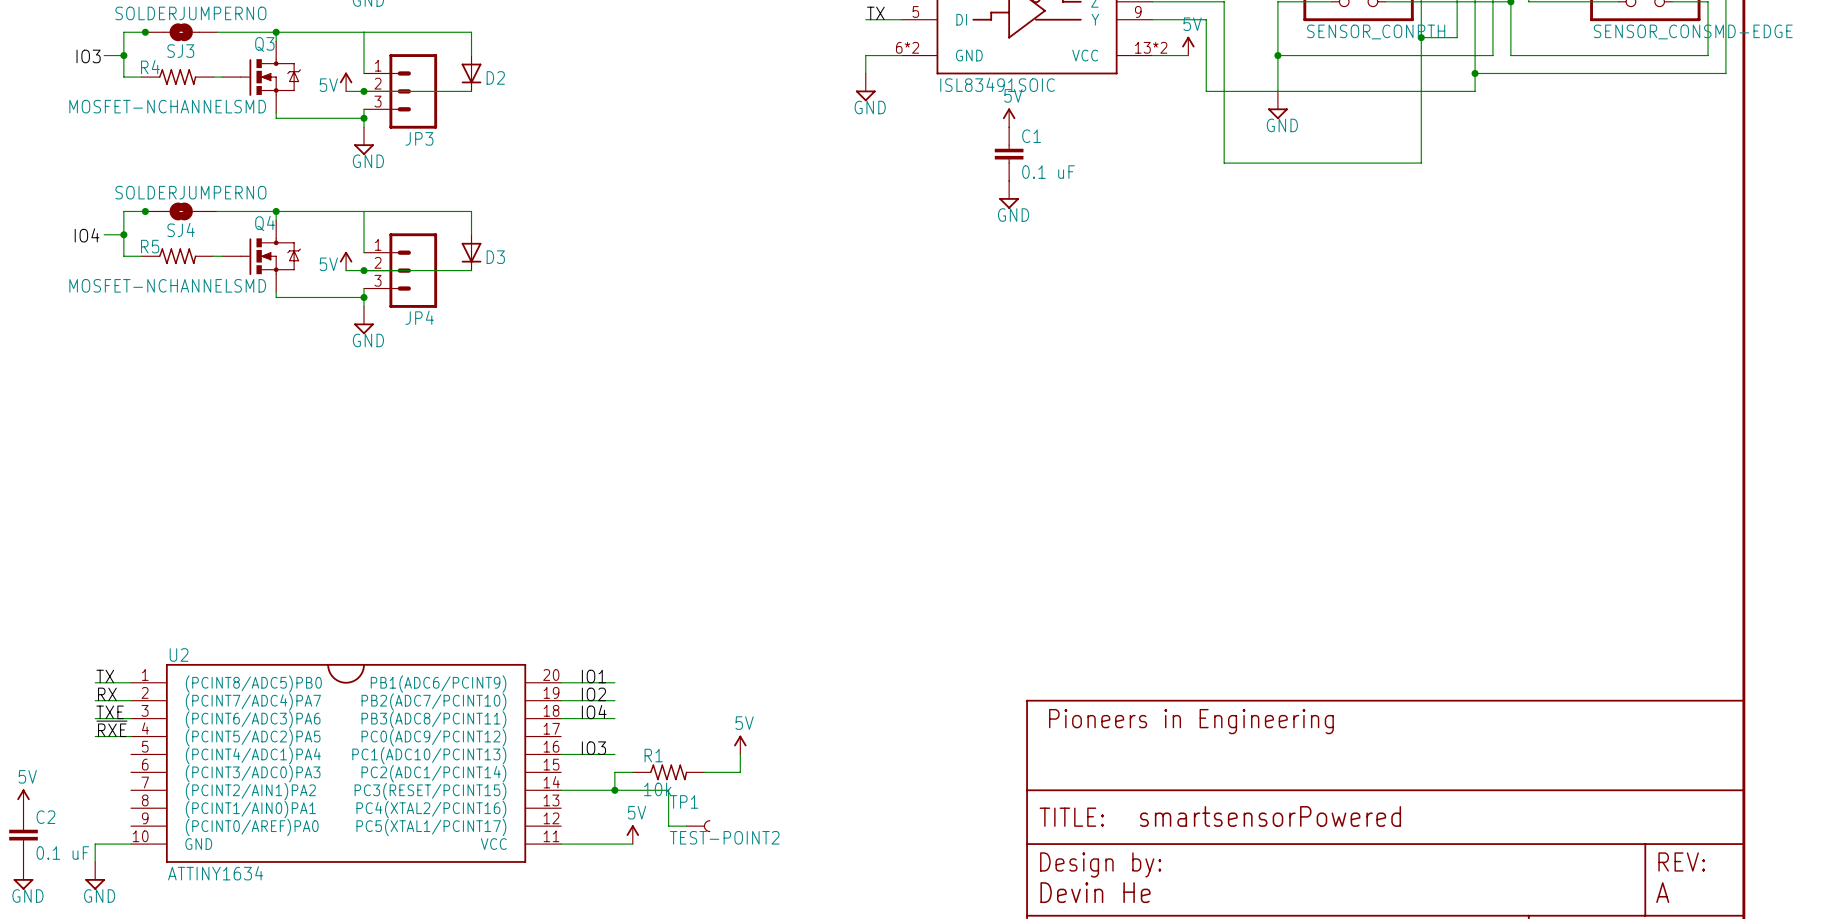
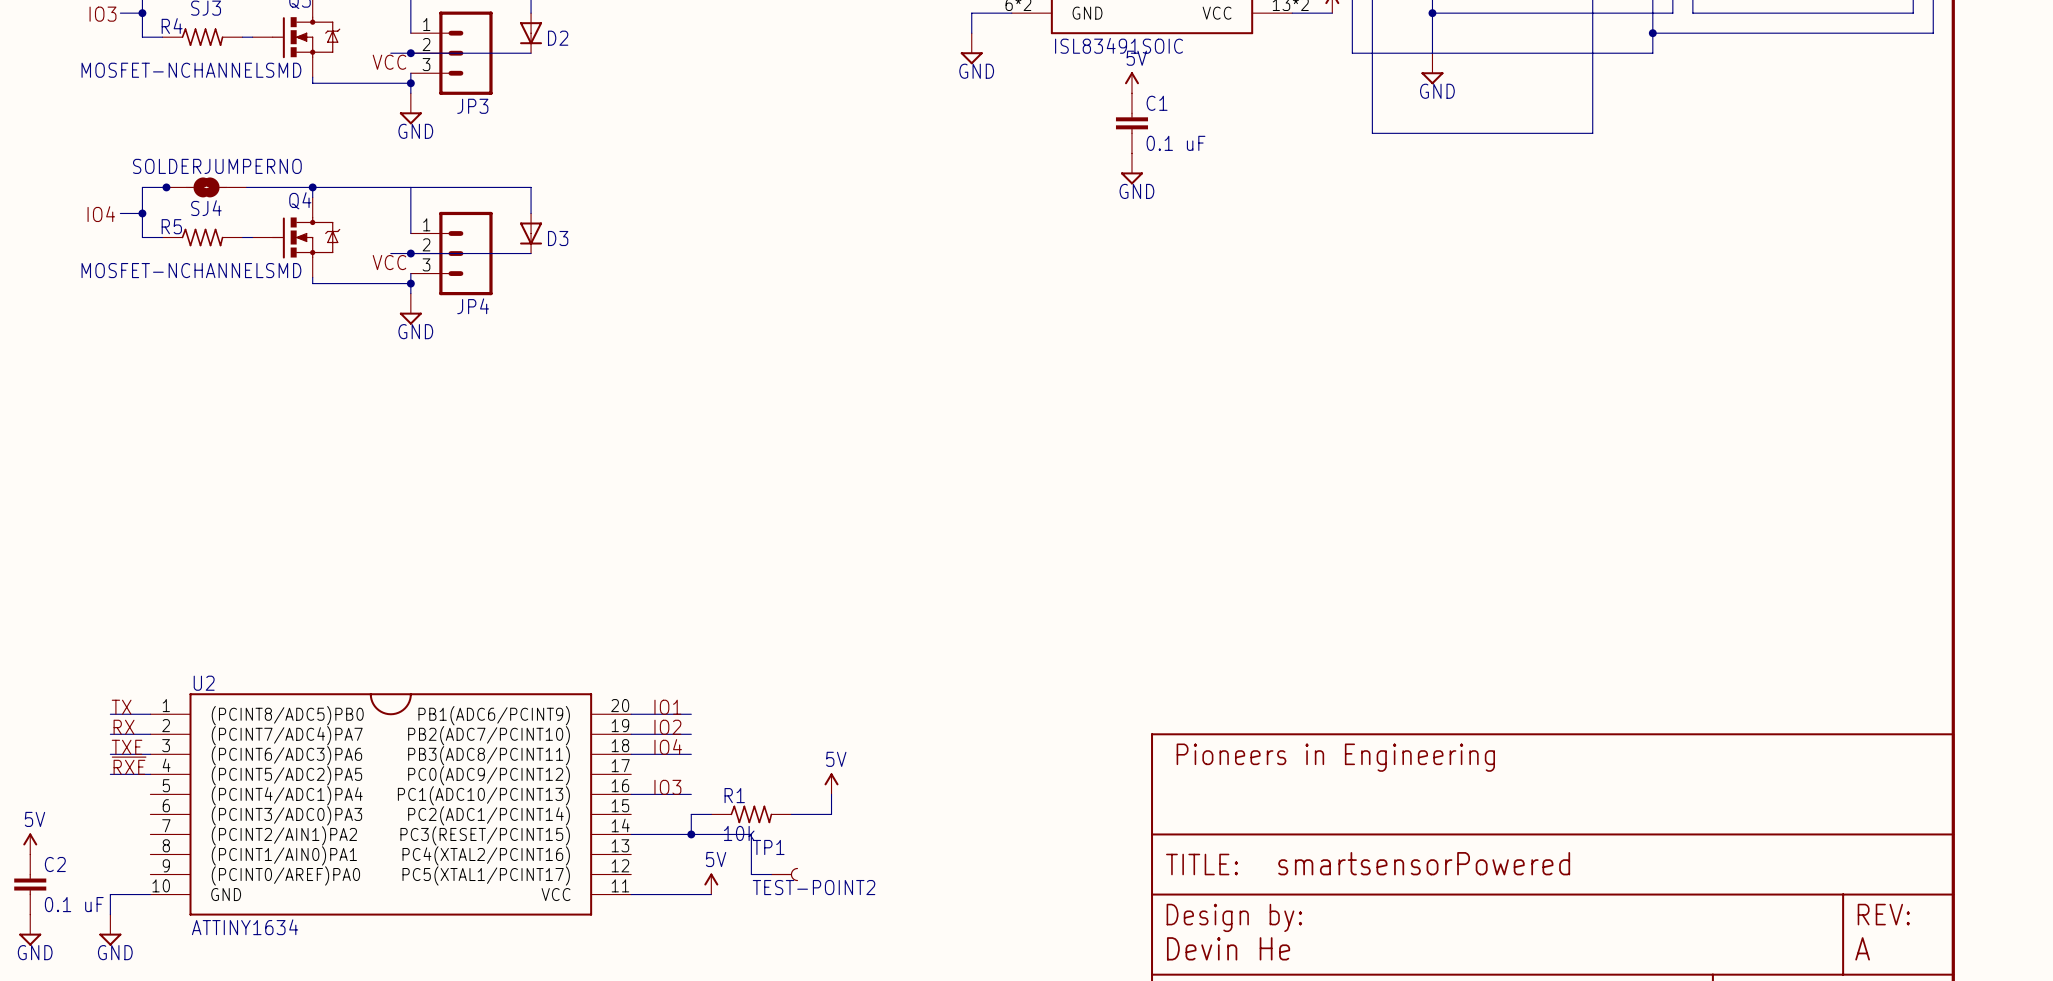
power symbol: 5V (346, 81) -> none
label: none -> VCC (389, 62)
power symbol: 5V (346, 261) -> none
label: none -> VCC (389, 262)

